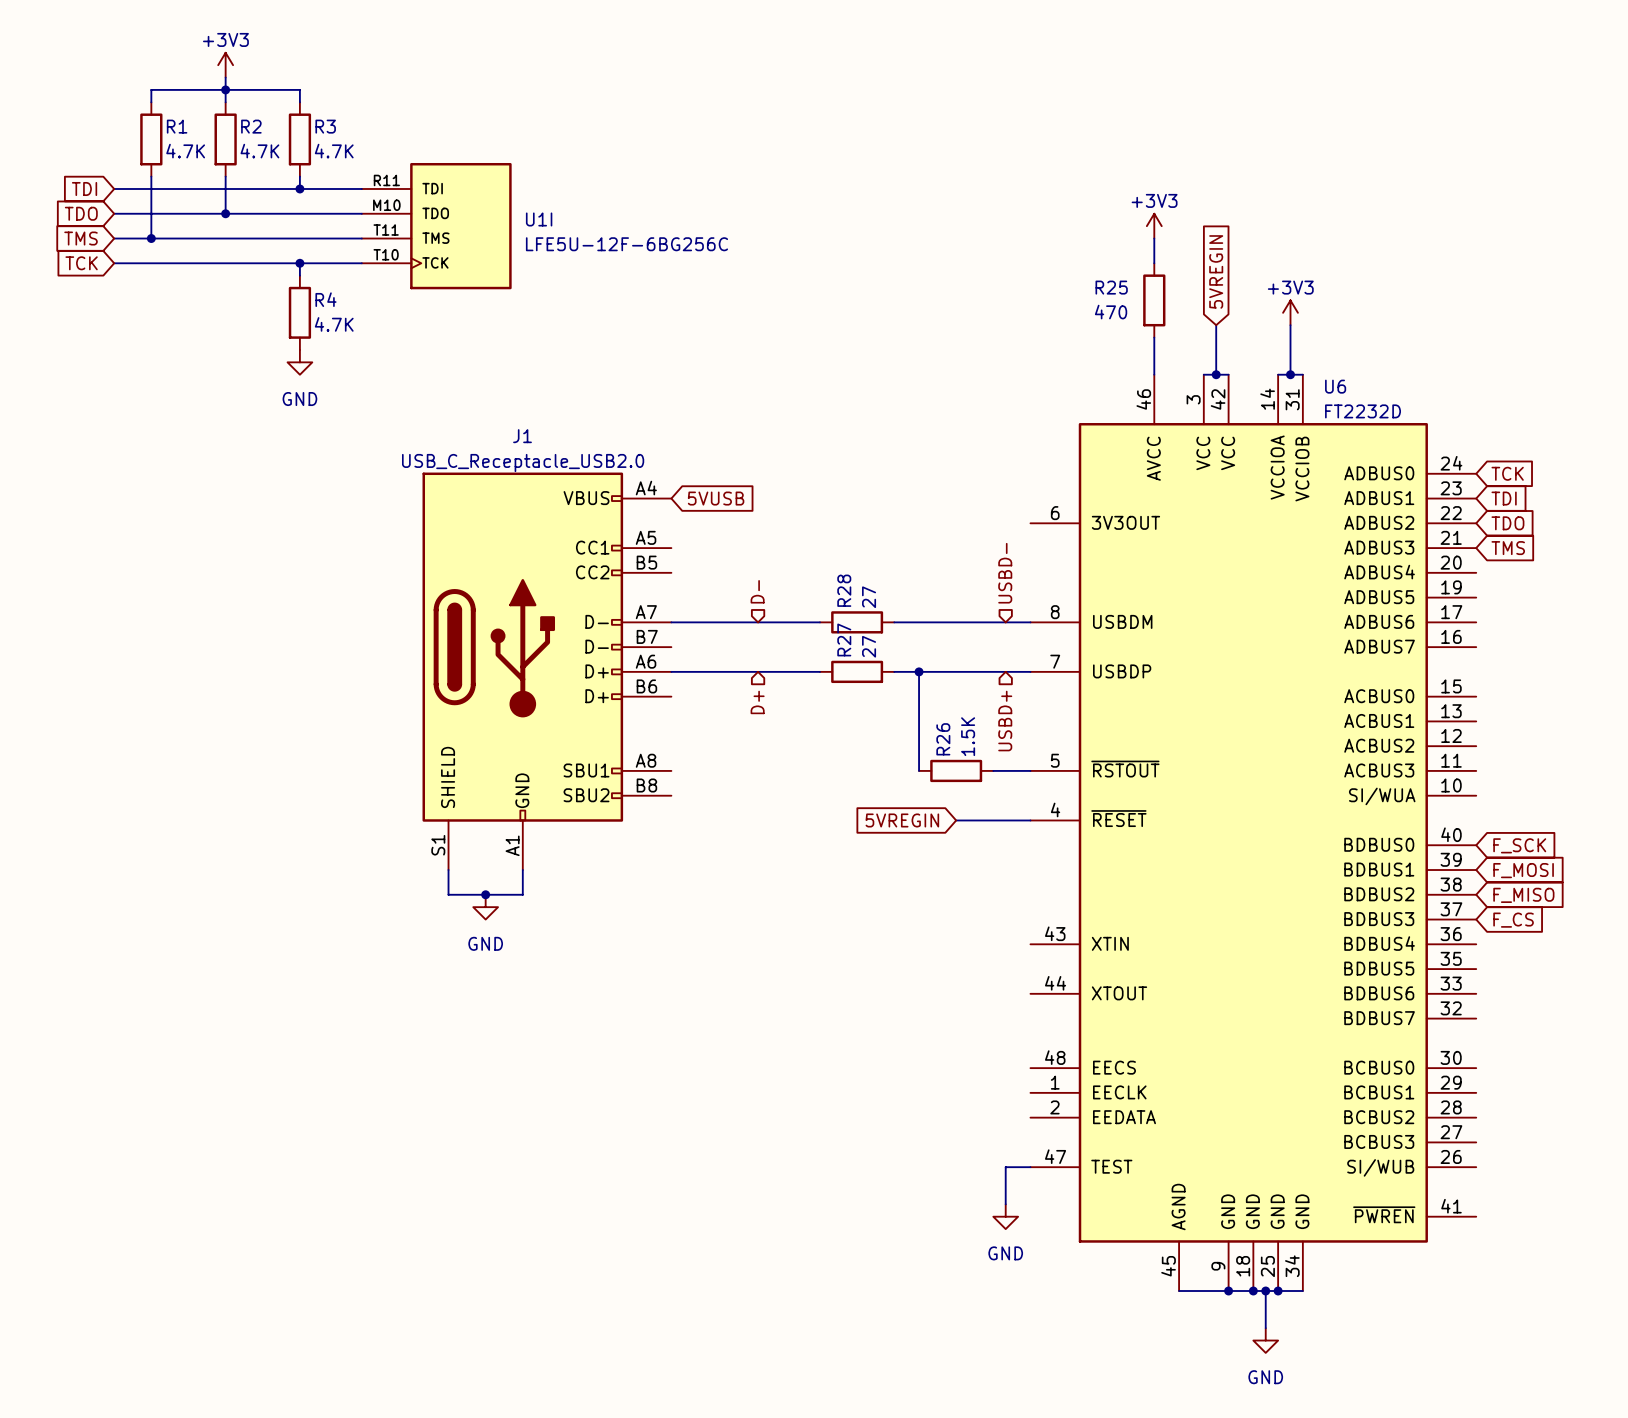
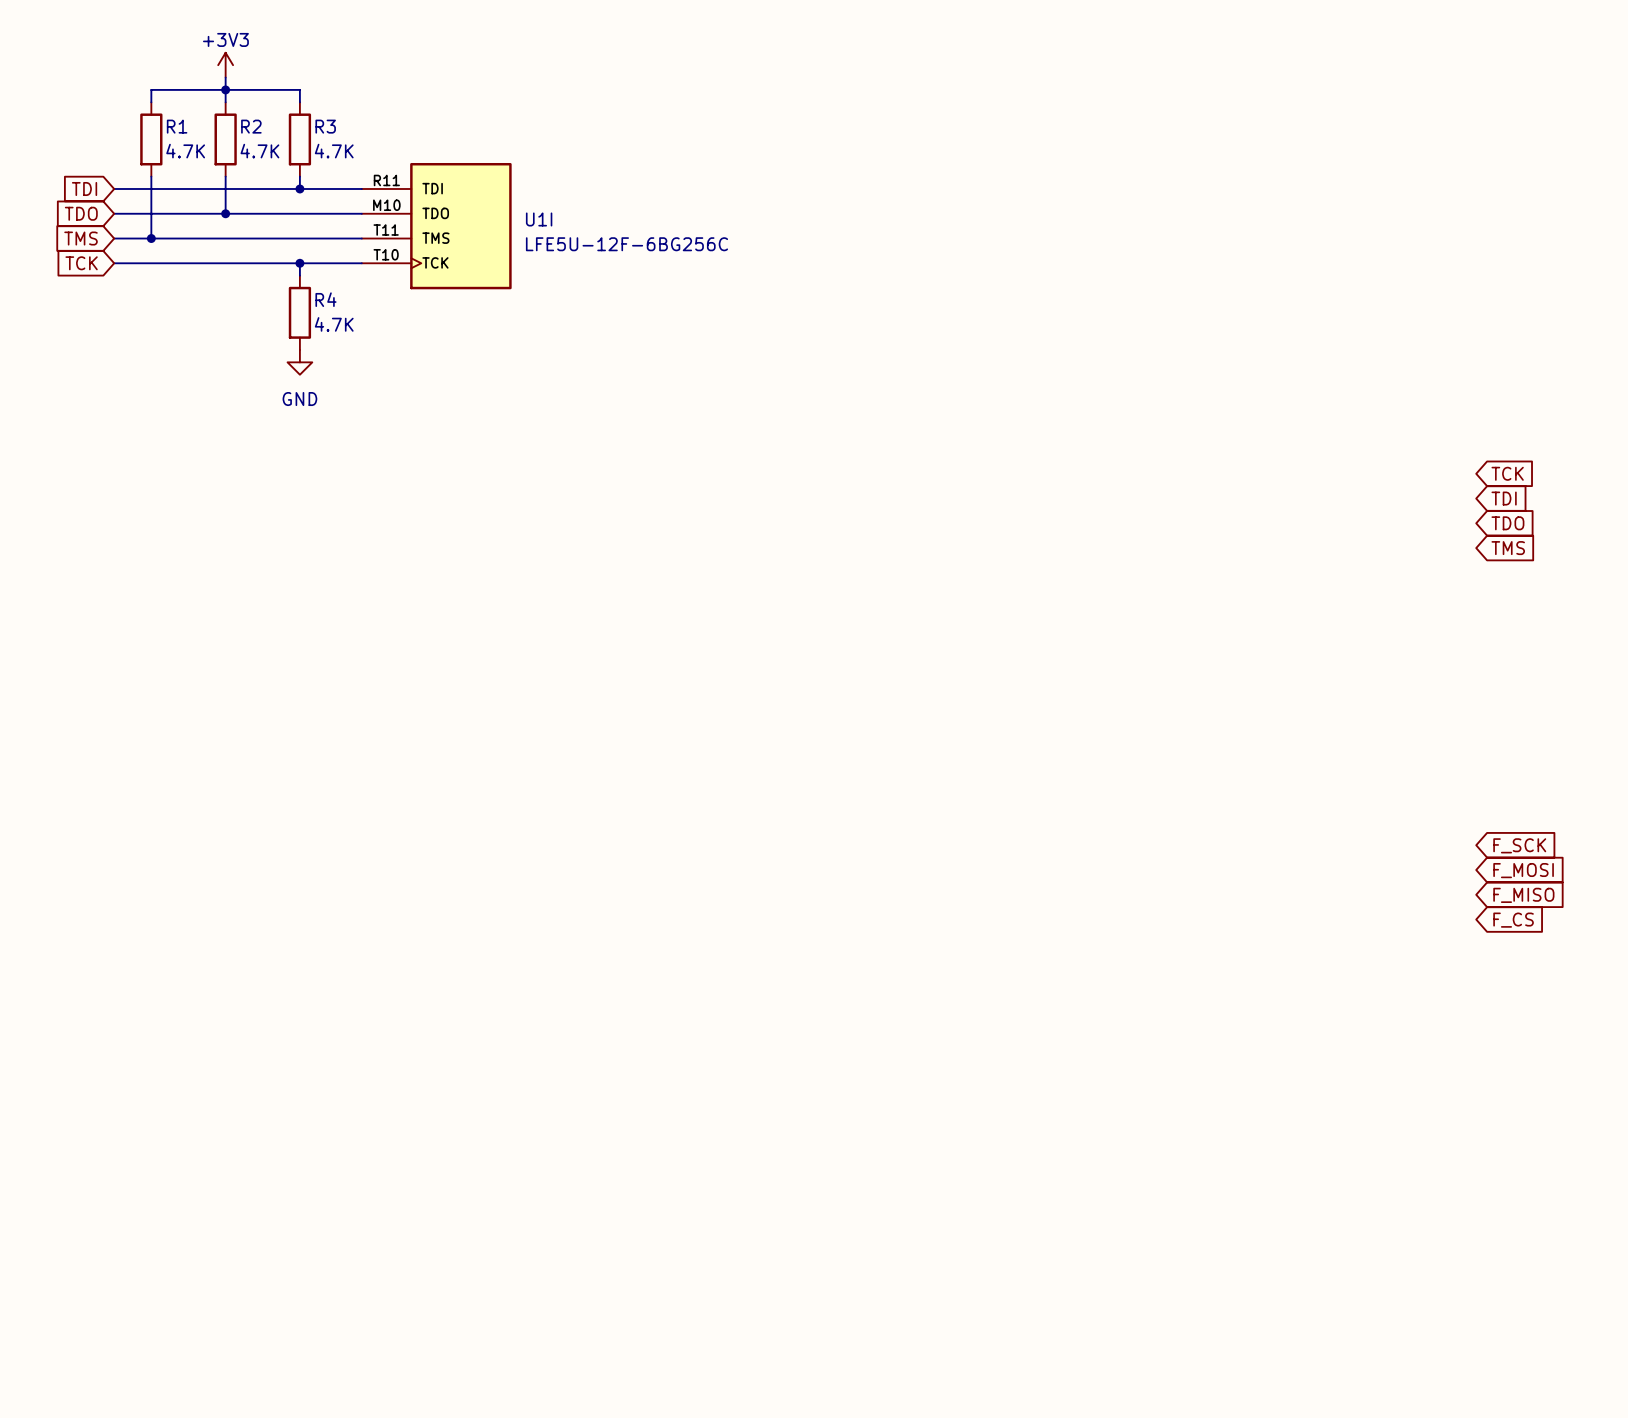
power symbol: +3V3 (1154, 226) -> none
wire: (1154, 238) (1154, 263) -> none
global label: 5VREGIN (1216, 271) -> none
R25: 470 (1154, 300) -> none
power symbol: +3V3 (1290, 312) -> none
wire: (1216, 325) (1216, 374) -> none
wire: (1290, 325) (1290, 374) -> none
wire: (1154, 337) (1154, 374) -> none
wire: (1203, 374) (1228, 374) -> none
junction: (1216, 374) -> none
wire: (1278, 374) (1302, 374) -> none
junction: (1290, 374) -> none
global label: 5VUSB (716, 498) -> none
hierarchical label: USBD- (1005, 573) -> none
hierarchical label: D- (757, 591) -> none
wire: (671, 622) (819, 622) -> none
R28: 27 (857, 622) -> none
wire: (894, 622) (1030, 622) -> none
J1: USB_C_Receptacle_USB2.0 (546, 671) -> none
wire: (671, 671) (819, 671) -> none
R27: 27 (857, 671) -> none
wire: (894, 671) (1030, 671) -> none
wire: (919, 671) (919, 770) -> none
junction: (919, 671) -> none
hierarchical label: D+ (757, 702) -> none
hierarchical label: USBD+ (1005, 721) -> none
R26: 1.5K (956, 770) -> none
wire: (993, 770) (1030, 770) -> none
global label: 5VREGIN (902, 820) -> none
wire: (956, 820) (1030, 820) -> none
U6: FT2232D (1253, 832) -> none
wire: (448, 870) (448, 894) (522, 894) (522, 870) -> none
junction: (485, 894) -> none
power symbol: GND (485, 907) -> none
wire: (1030, 1167) (1005, 1167) (1005, 1204) -> none
power symbol: GND (1005, 1216) -> none
wire: (1179, 1291) (1302, 1291) -> none
junction: (1228, 1291) -> none
junction: (1253, 1291) -> none
wire: (1265, 1291) (1265, 1328) -> none
junction: (1265, 1291) -> none
junction: (1278, 1291) -> none
power symbol: GND (1265, 1340) -> none

